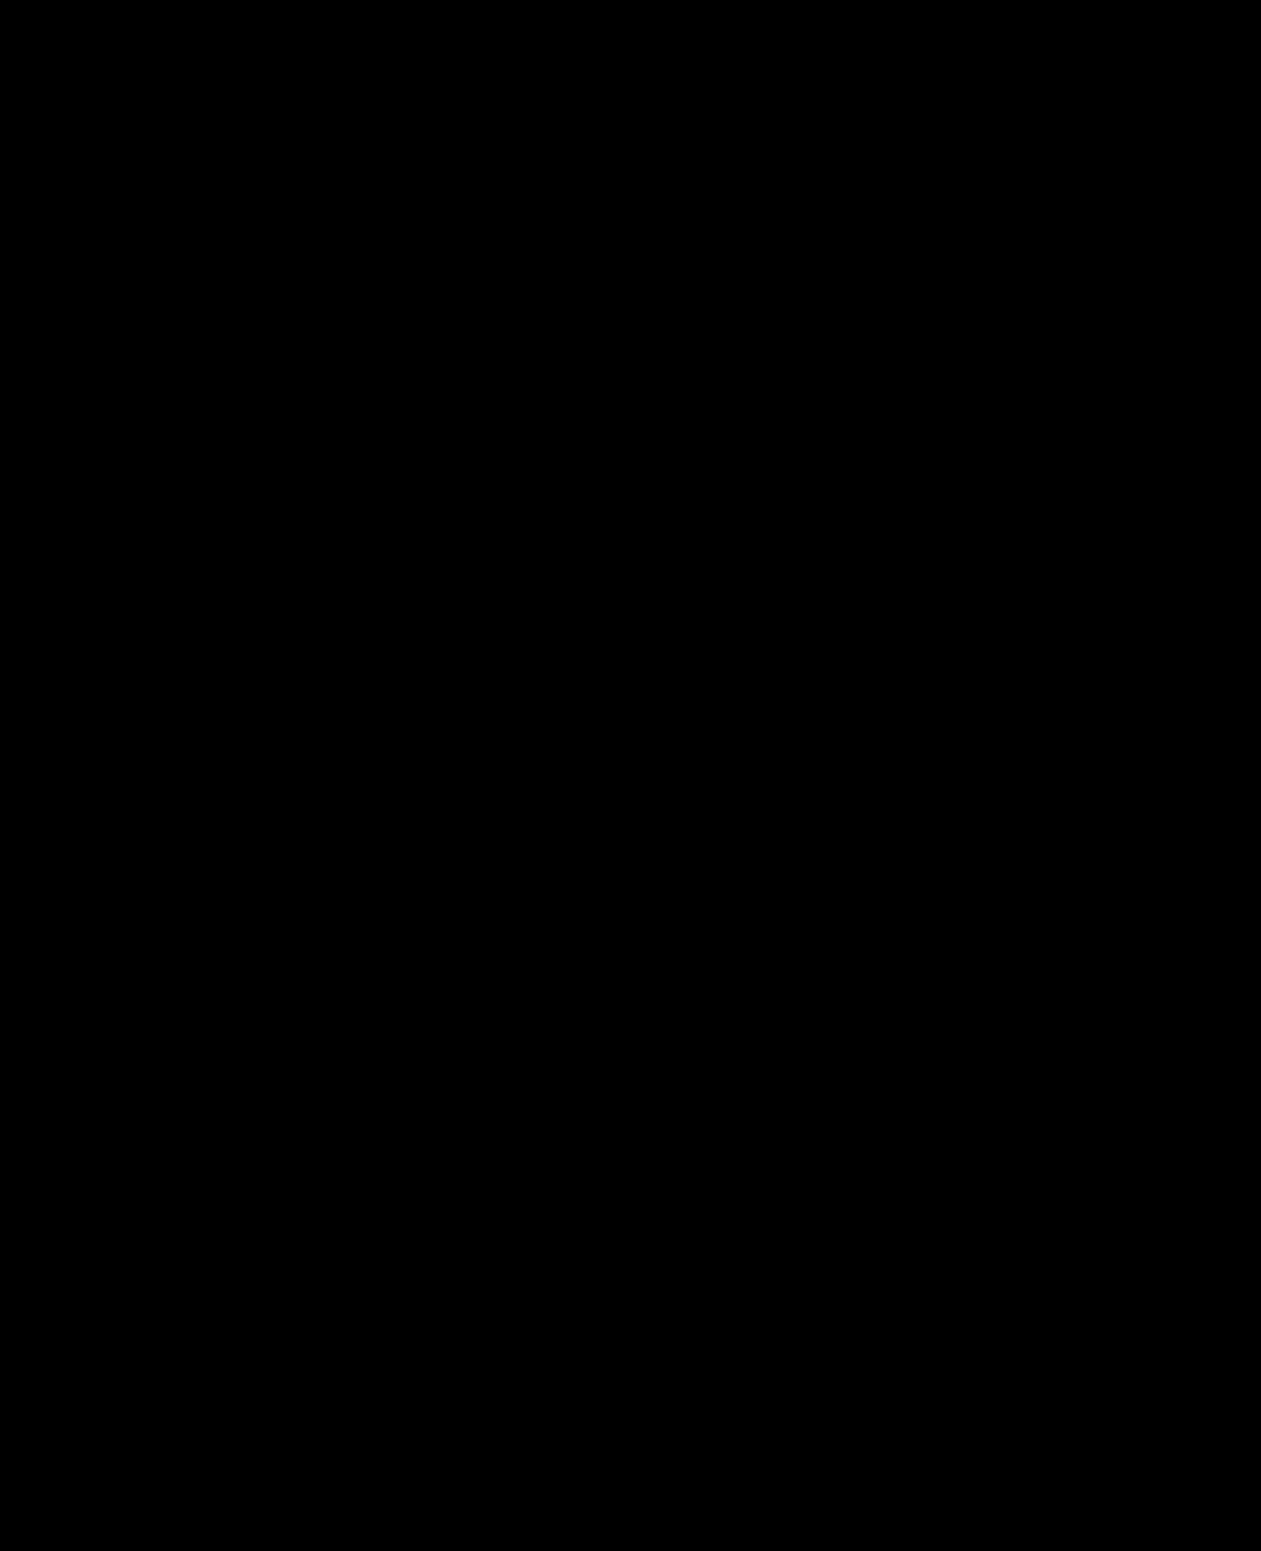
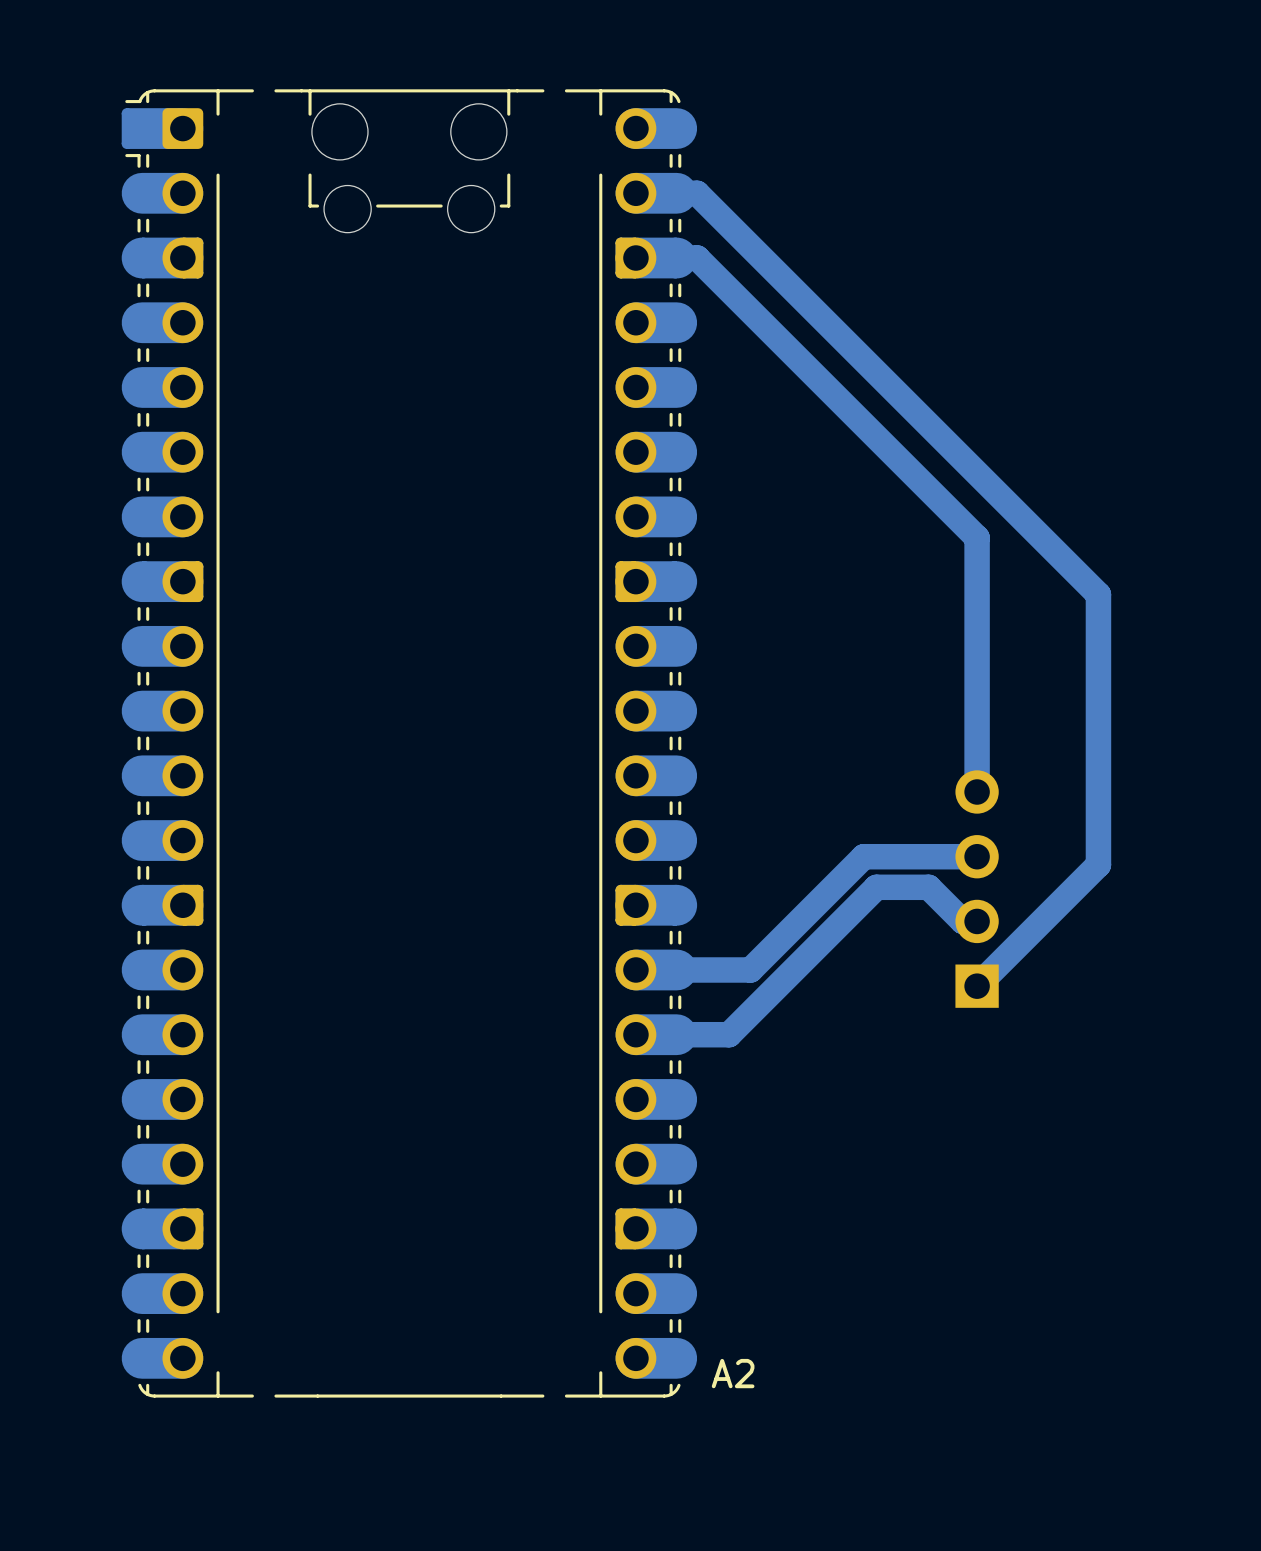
track: none -> (656, 193) (697, 193) (1098, 594) (1098, 864) (977, 986)
track: none -> (656, 258) (697, 258) (977, 537) (977, 791)
A2: none -> (409, 743)
track: none -> (977, 856) (863, 856) (750, 969) (656, 969)
part: none -> (977, 889)
track: none -> (977, 921) (962, 921) (928, 887) (876, 887) (729, 1034) (656, 1034)

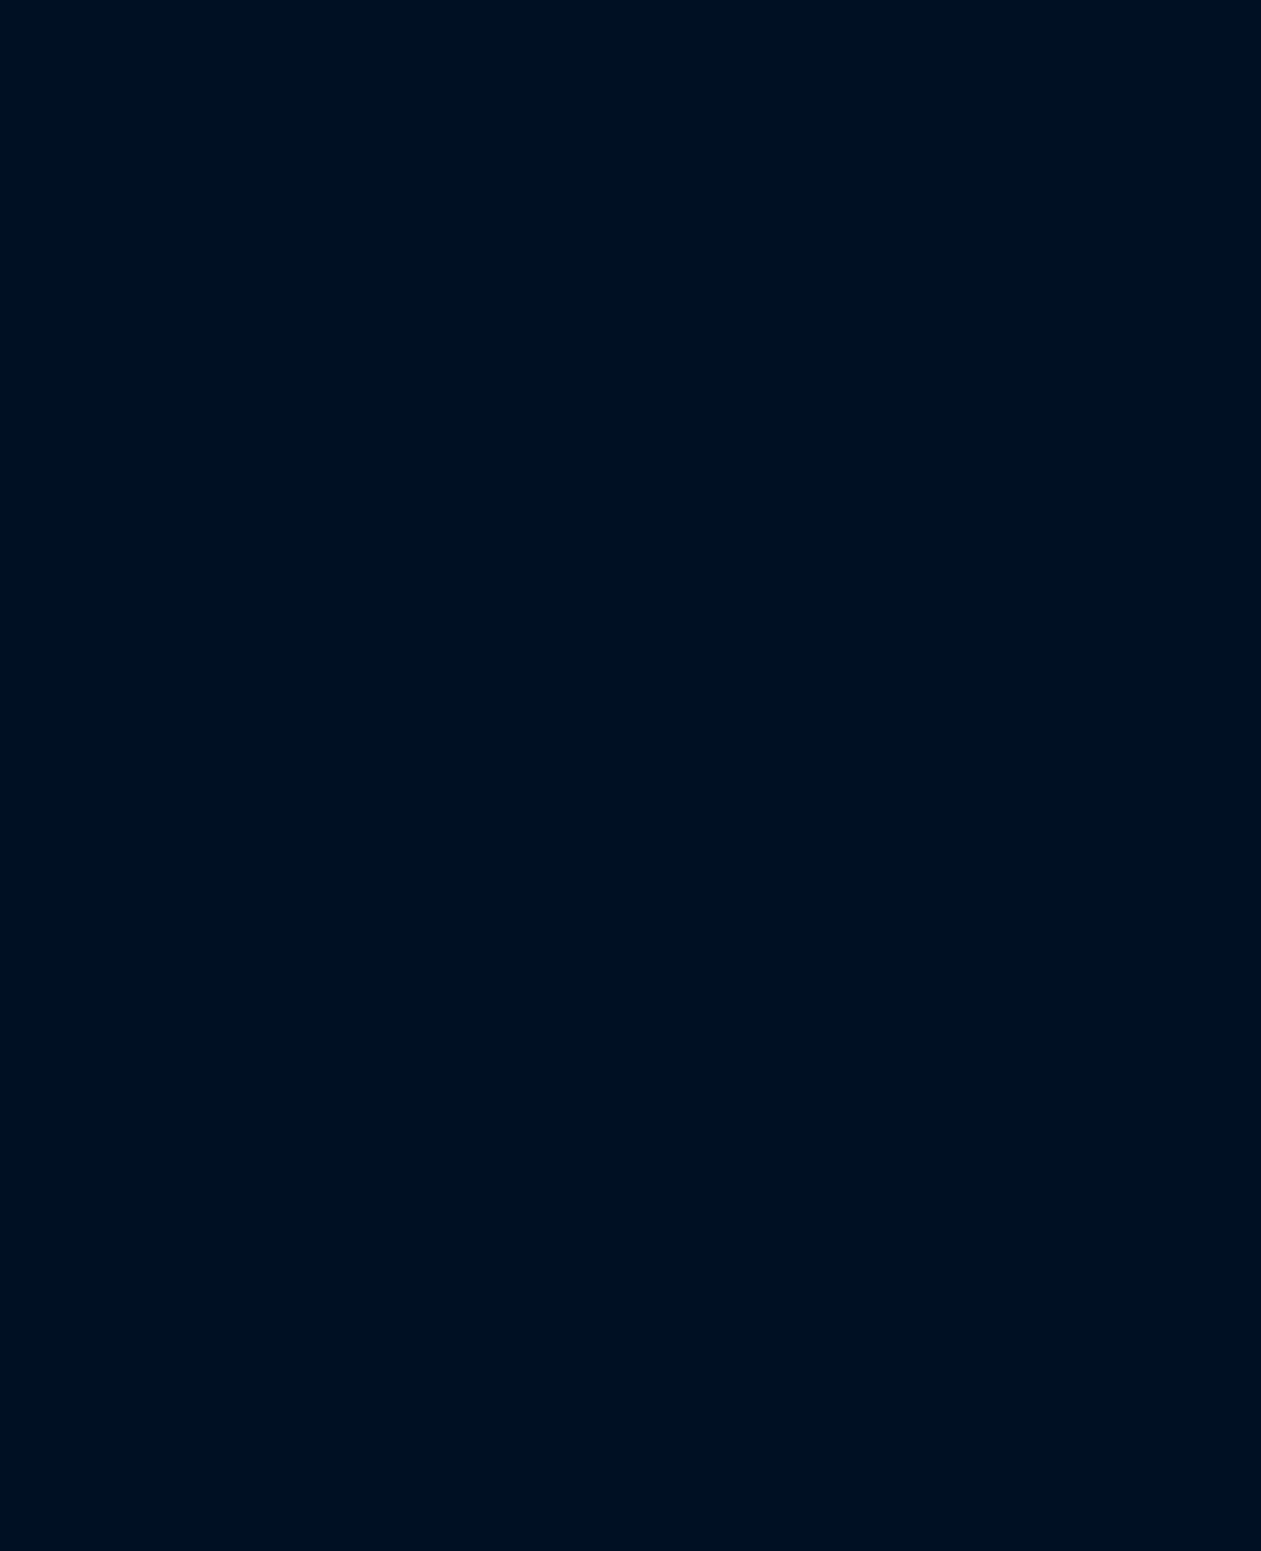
track: (656, 193) (697, 193) (1098, 594) (1098, 864) (977, 986) -> none
track: (656, 258) (697, 258) (977, 537) (977, 791) -> none
A2: (409, 743) -> none
track: (977, 856) (863, 856) (750, 969) (656, 969) -> none
part: (977, 889) -> none
track: (977, 921) (962, 921) (928, 887) (876, 887) (729, 1034) (656, 1034) -> none

